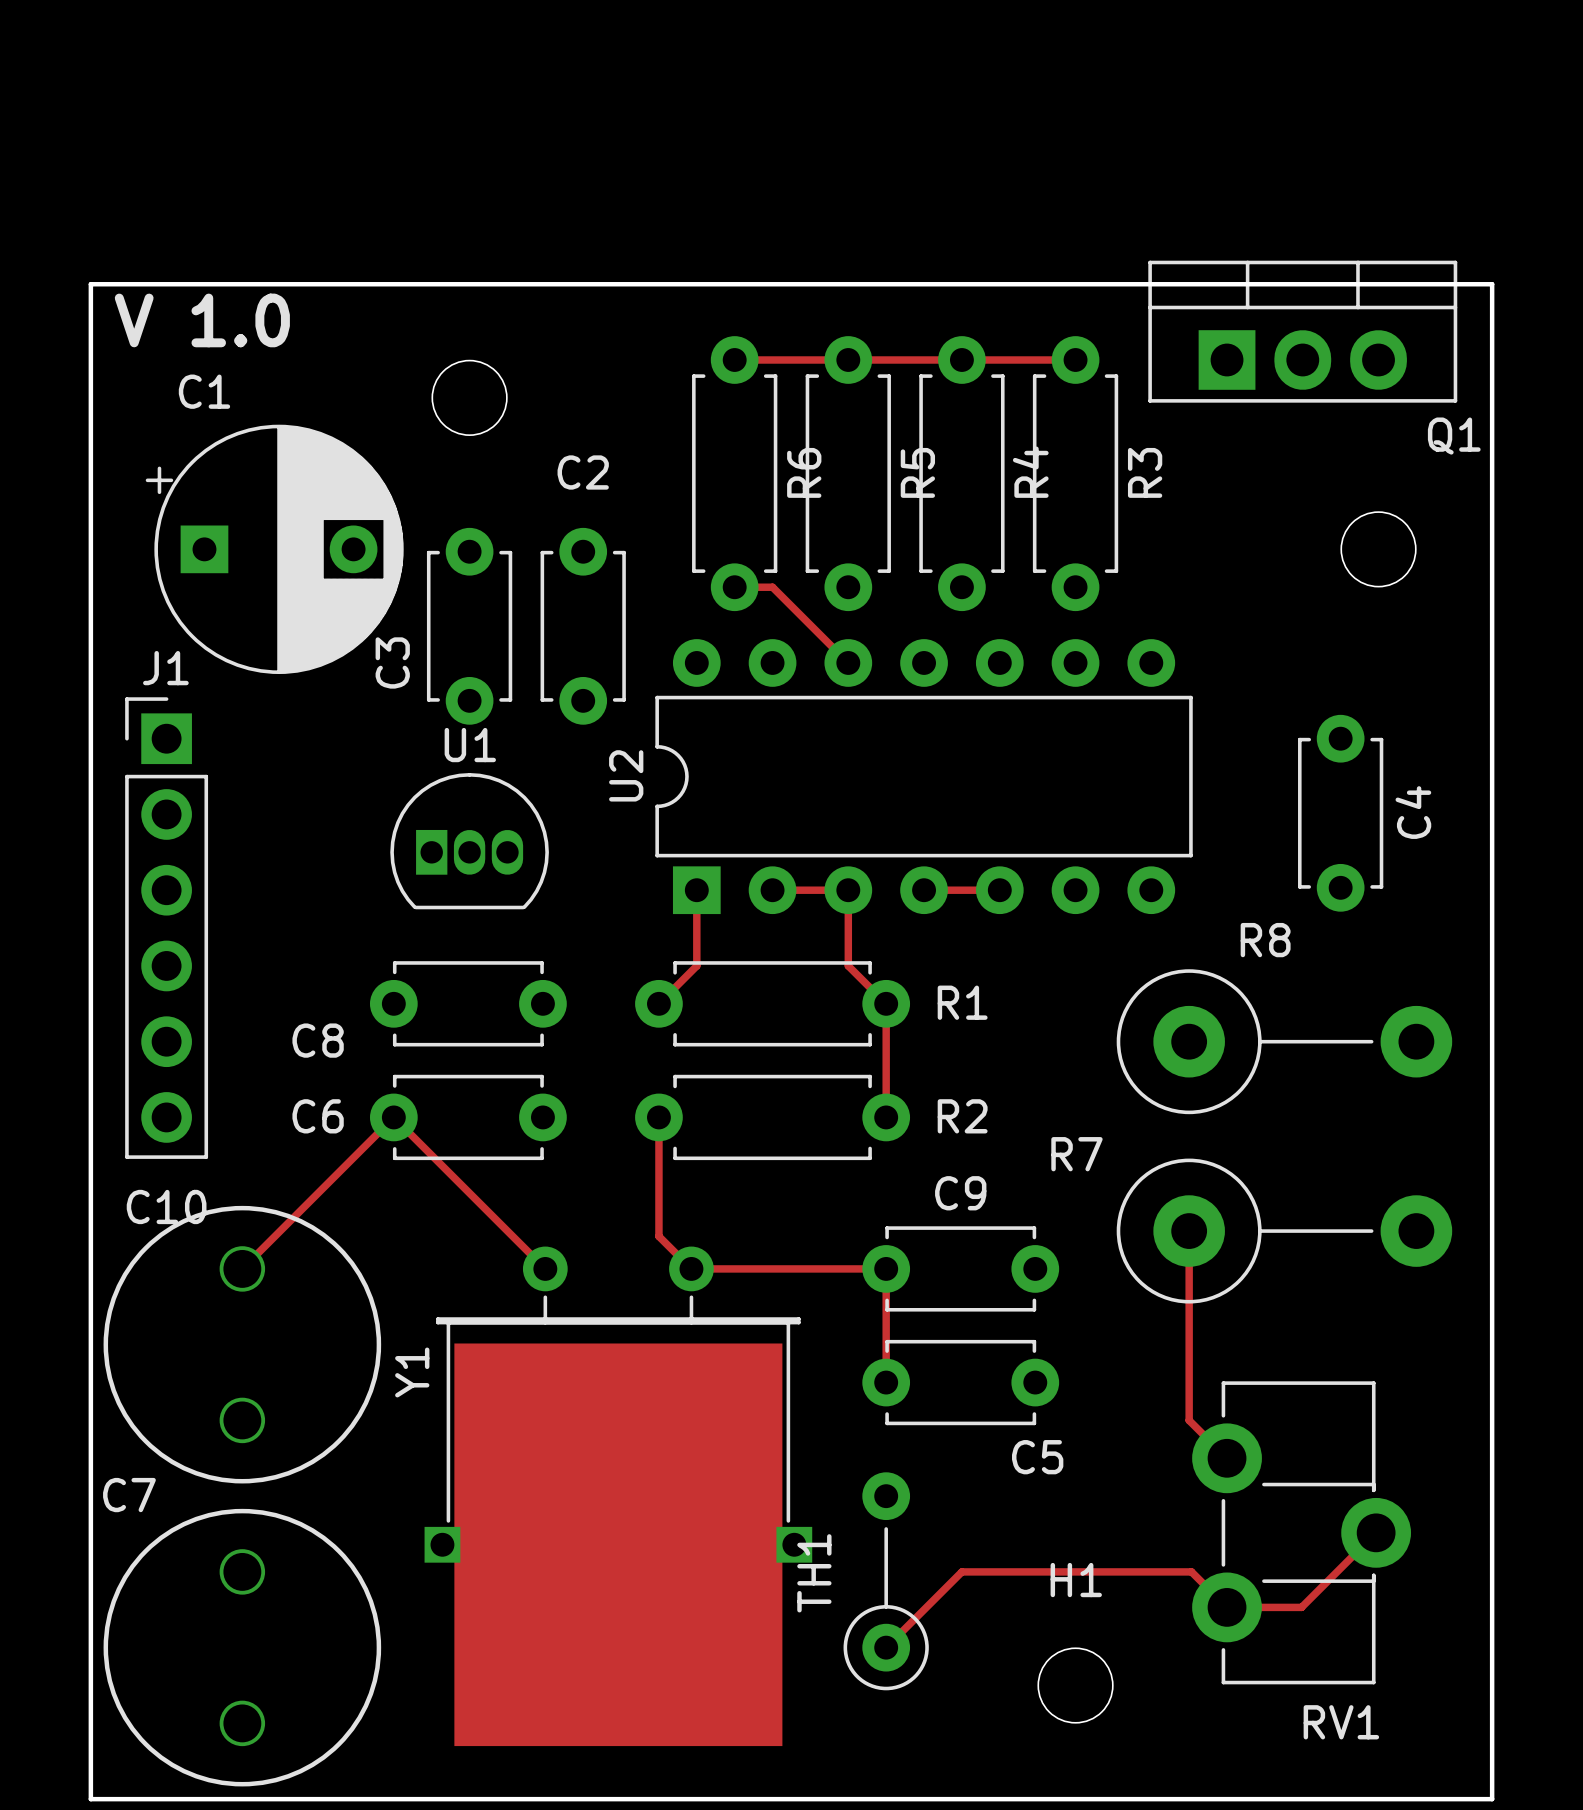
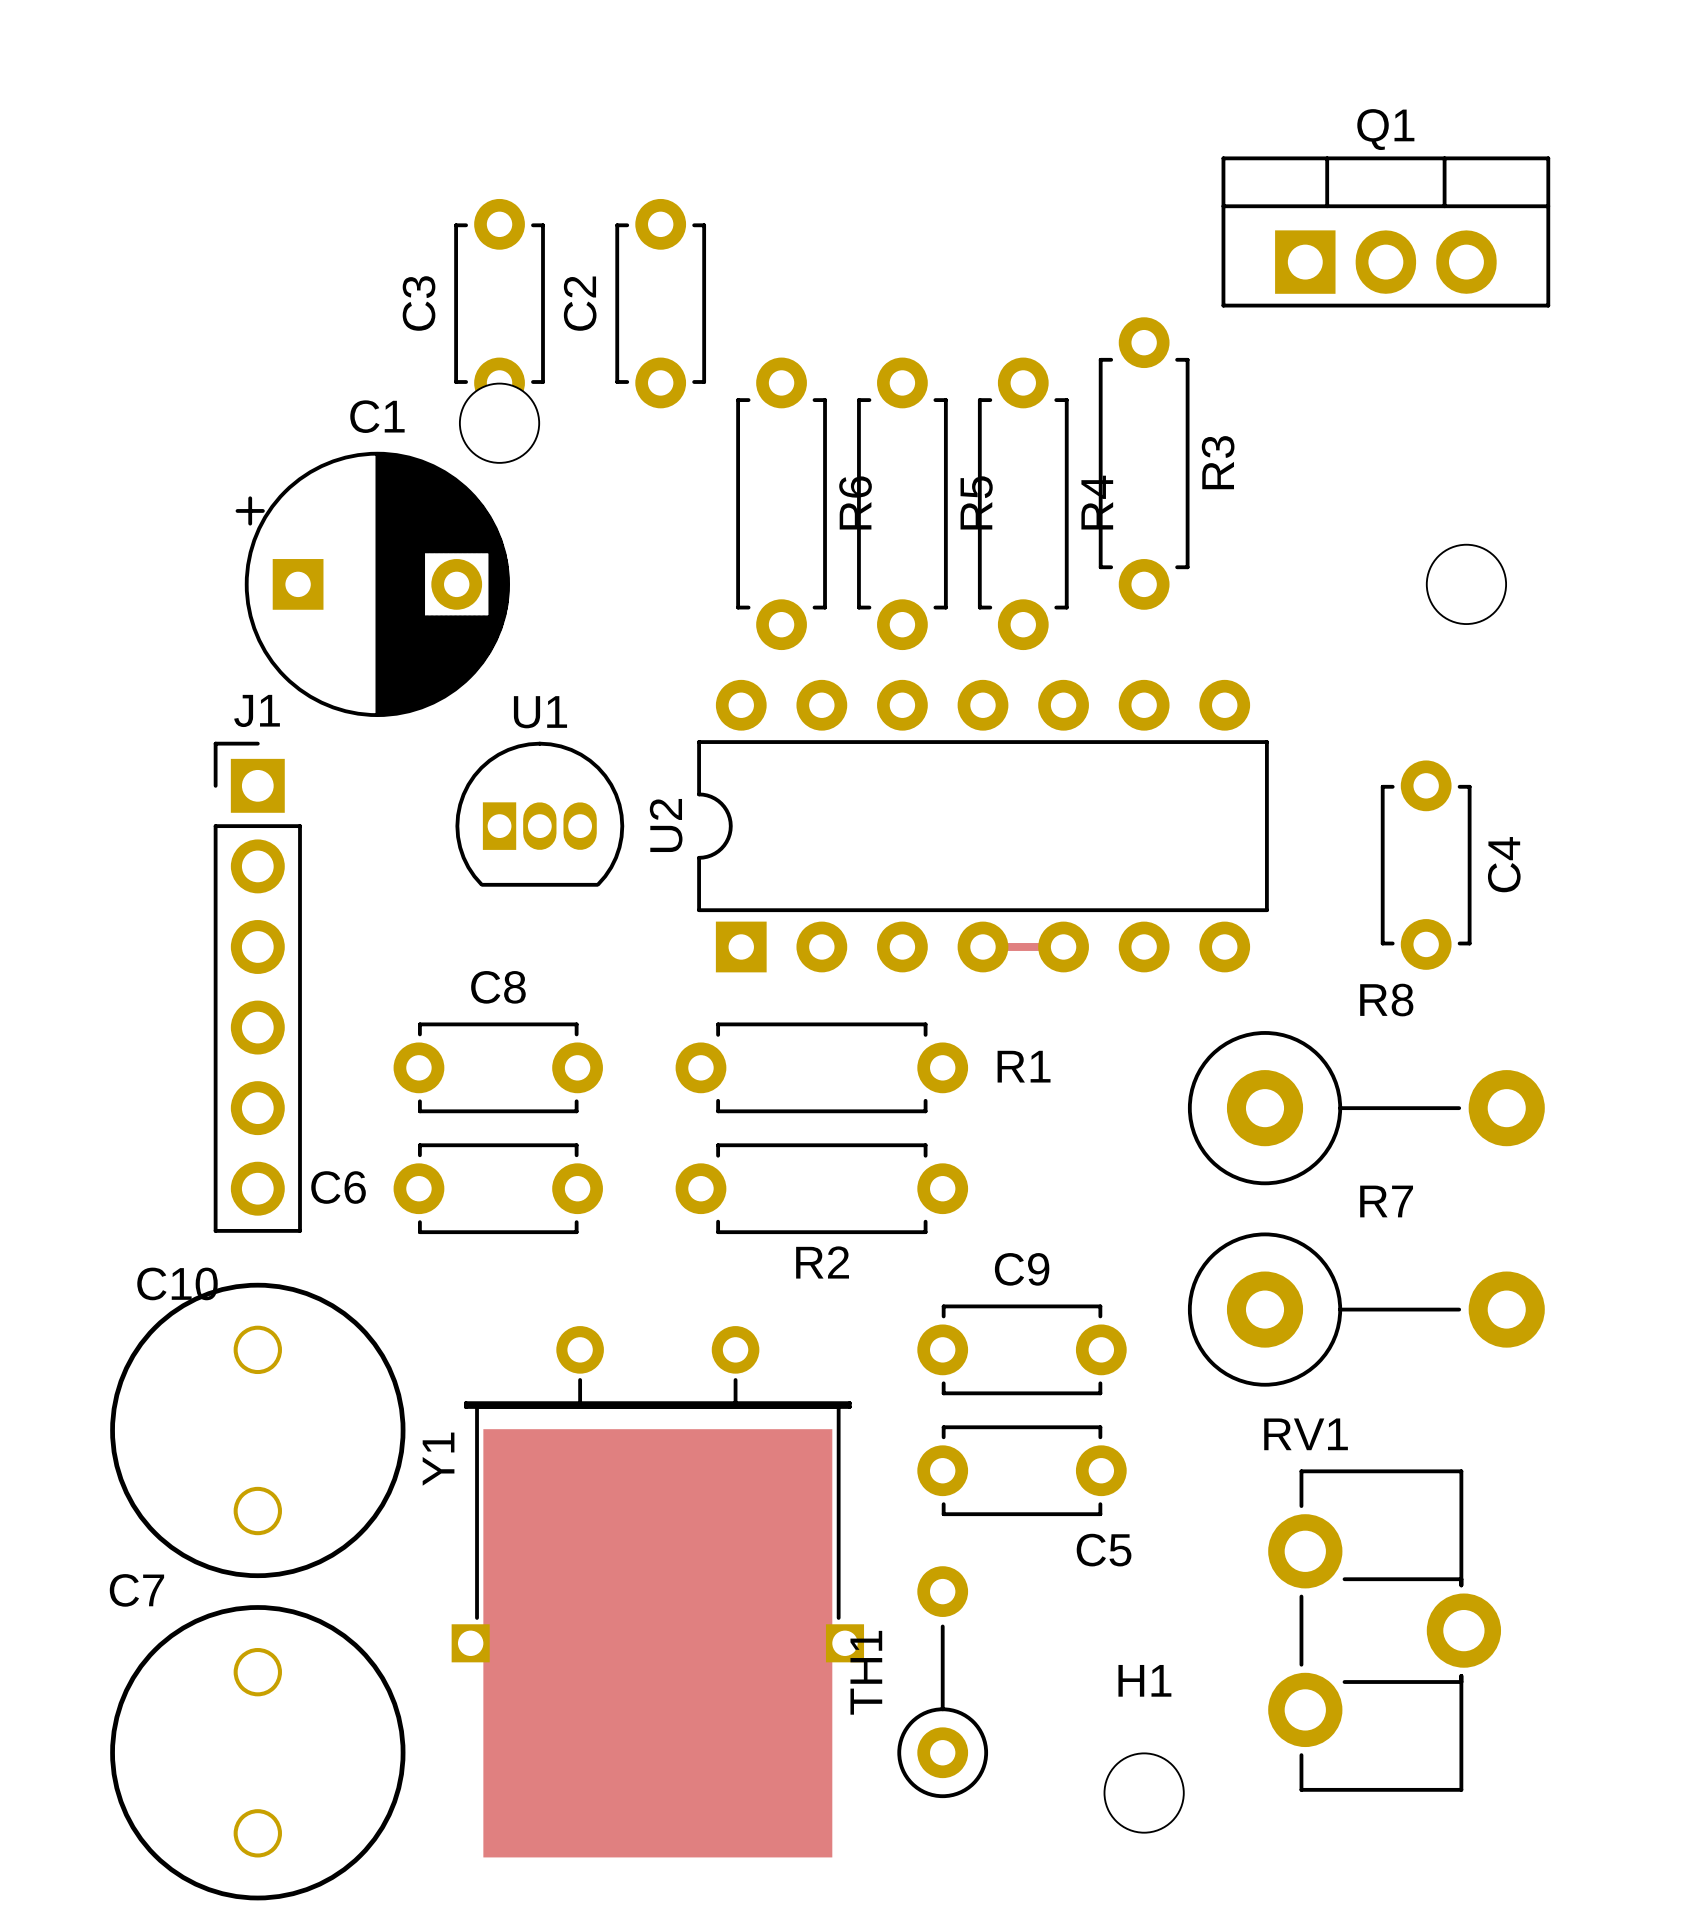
board edge: (90, 284) (90, 1799) (1492, 1799) (1492, 284) (90, 284) -> none
text: V 1.0 (202, 320) -> none
Q1 position: (1302, 331) -> (1385, 231)
track: (734, 359) (1075, 359) -> none
C1 name position: C1 (204, 391) -> C1 (377, 416)
Q1 name position: Q1 (1454, 436) -> Q1 (1385, 129)
C2 name rotation: 0° (583, 472) -> 90° counterclockwise (580, 303)
C2 name position: C2 (583, 472) -> C2 (580, 303)
R3 position: (1075, 473) -> (1144, 463)
C1 position: (274, 549) -> (372, 584)
track: (734, 587) (772, 587) (848, 662) -> none
C3 position: (469, 626) -> (499, 303)
C2 position: (583, 626) -> (660, 303)
C3 name position: C3 (392, 662) -> C3 (419, 303)
U1 position: (469, 841) -> (539, 814)
track: (696, 890) (696, 965) (658, 1003) -> none
track: (772, 890) (848, 890) (848, 965) (886, 1003) (886, 1117) -> none
J1 position: (166, 928) -> (257, 987)
R8 name position: R8 (1265, 940) -> R8 (1386, 1000)
C8 name position: C8 (318, 1040) -> C8 (498, 987)
R2 name position: R2 (962, 1116) -> R2 (822, 1262)
track: (658, 1117) (658, 1236) (691, 1268) (886, 1268) (886, 1382) -> none
R7 name position: R7 (1076, 1154) -> R7 (1386, 1201)
track: (1189, 1231) (1189, 1420) (1227, 1458) -> none
track: (242, 1268) (393, 1117) (545, 1268) -> none
track: (1376, 1532) (1301, 1607) (1227, 1607) (1191, 1571) (961, 1571) (886, 1647) -> none
RV1 name position: RV1 (1341, 1722) -> RV1 (1306, 1434)

